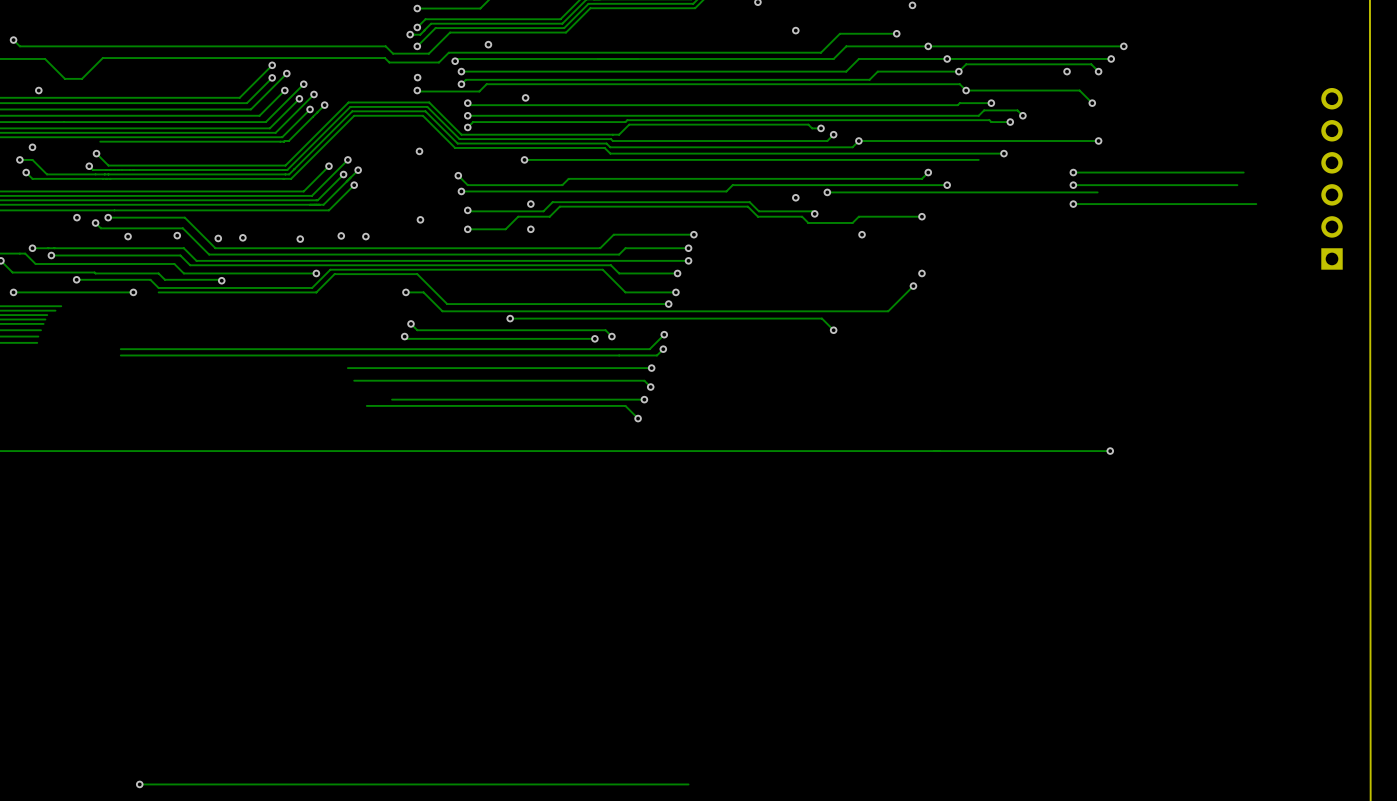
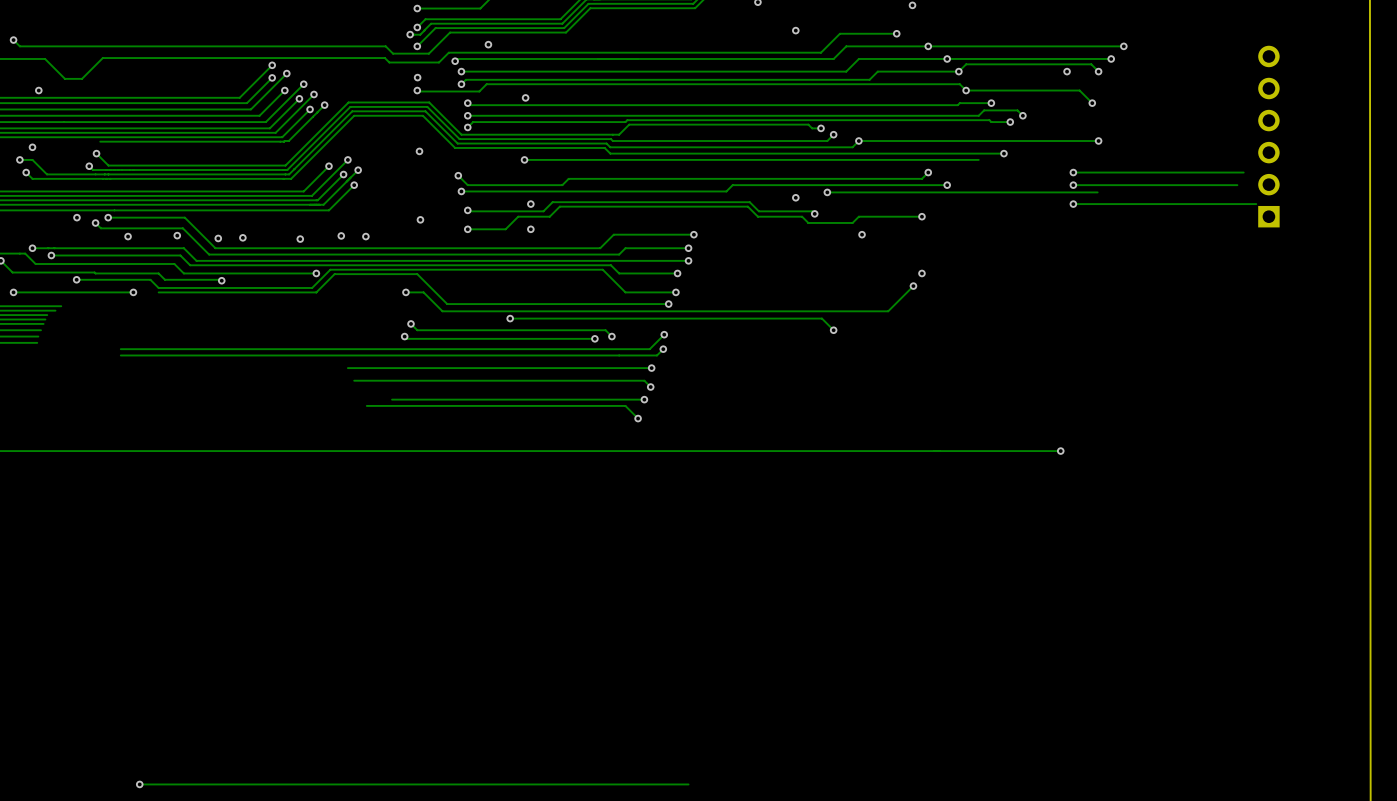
part position: (1332, 178) -> (1268, 136)
track: (1110, 451) (1060, 451) -> none
via position: (1110, 451) -> (1060, 451)

